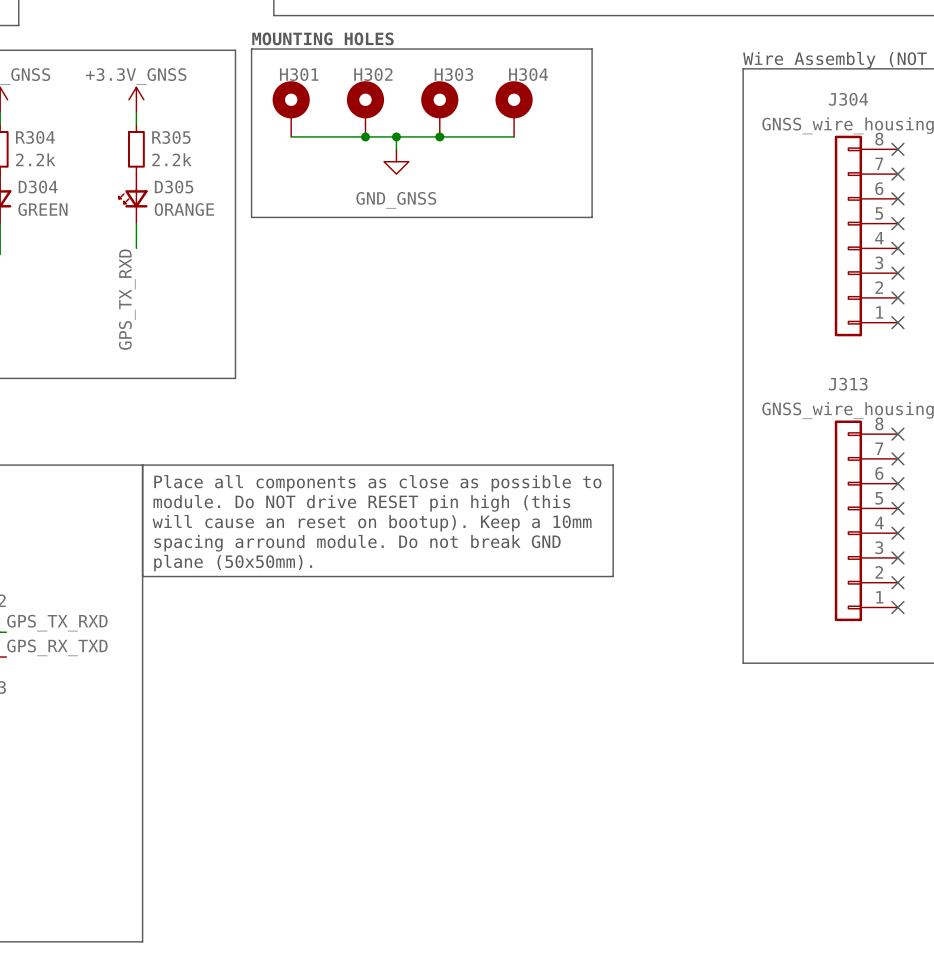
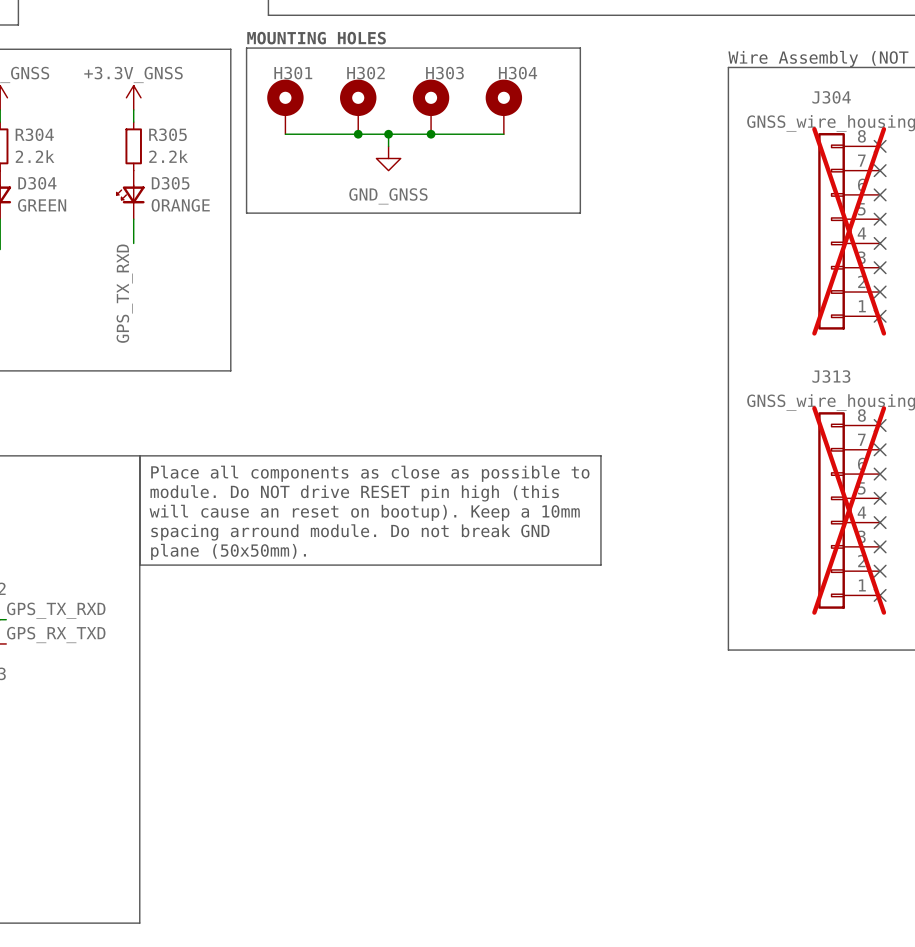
J304 do-not-place cross: none -> (849, 231)
J313 do-not-place cross: none -> (849, 510)

